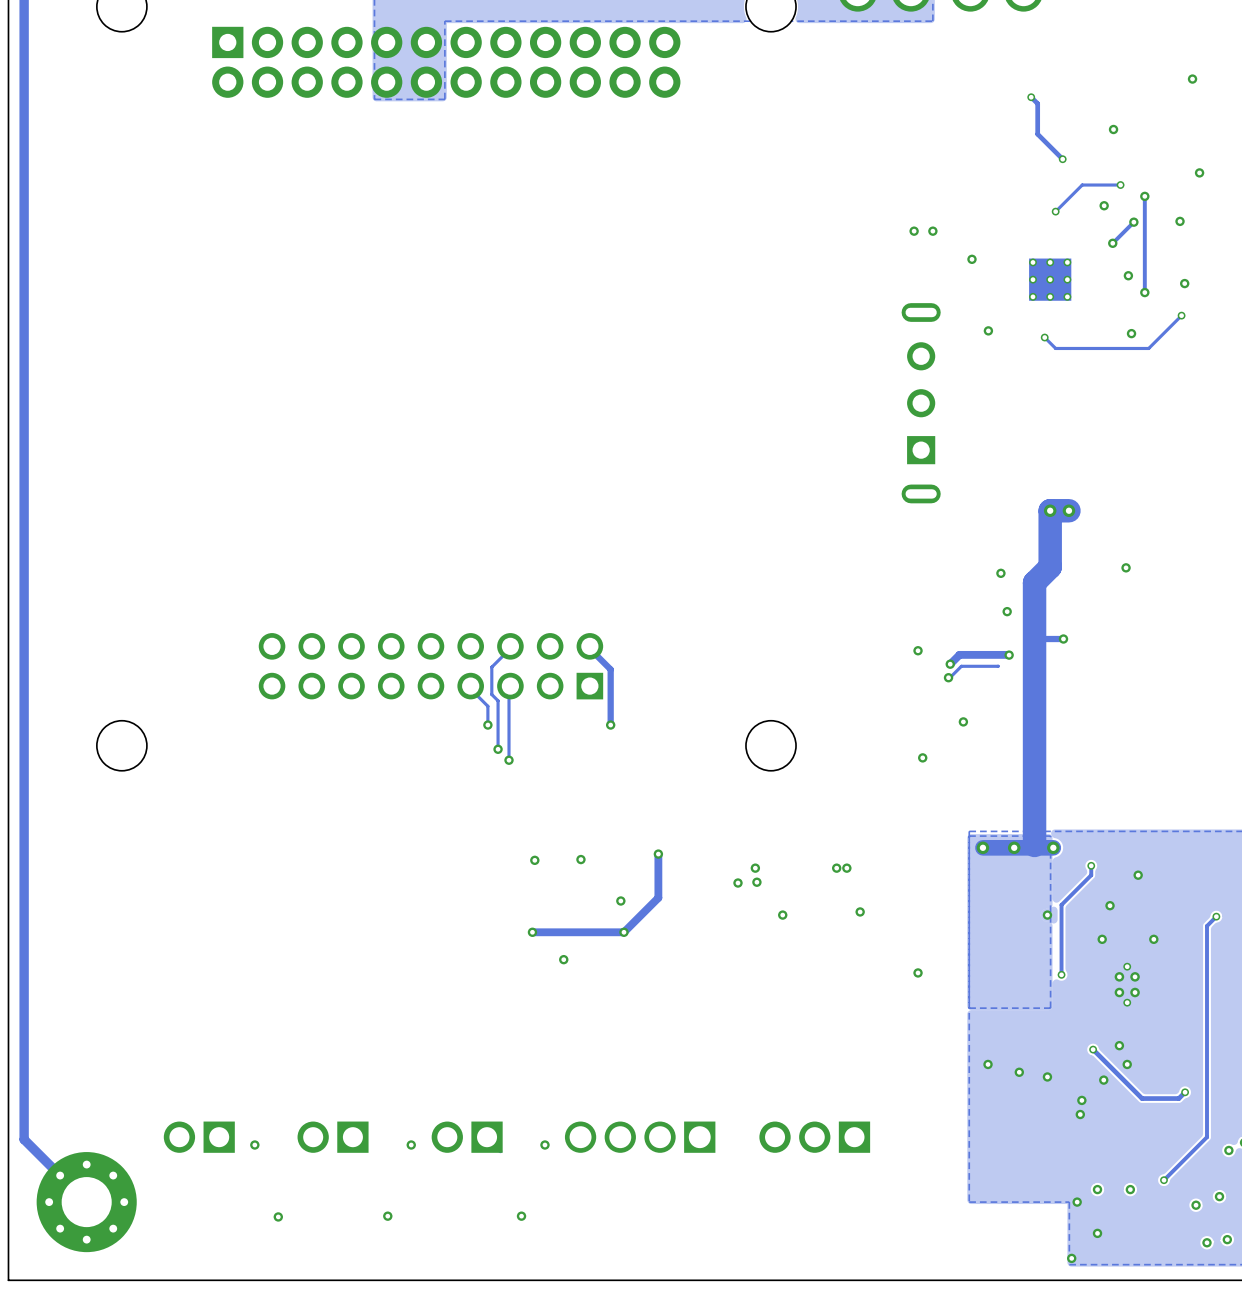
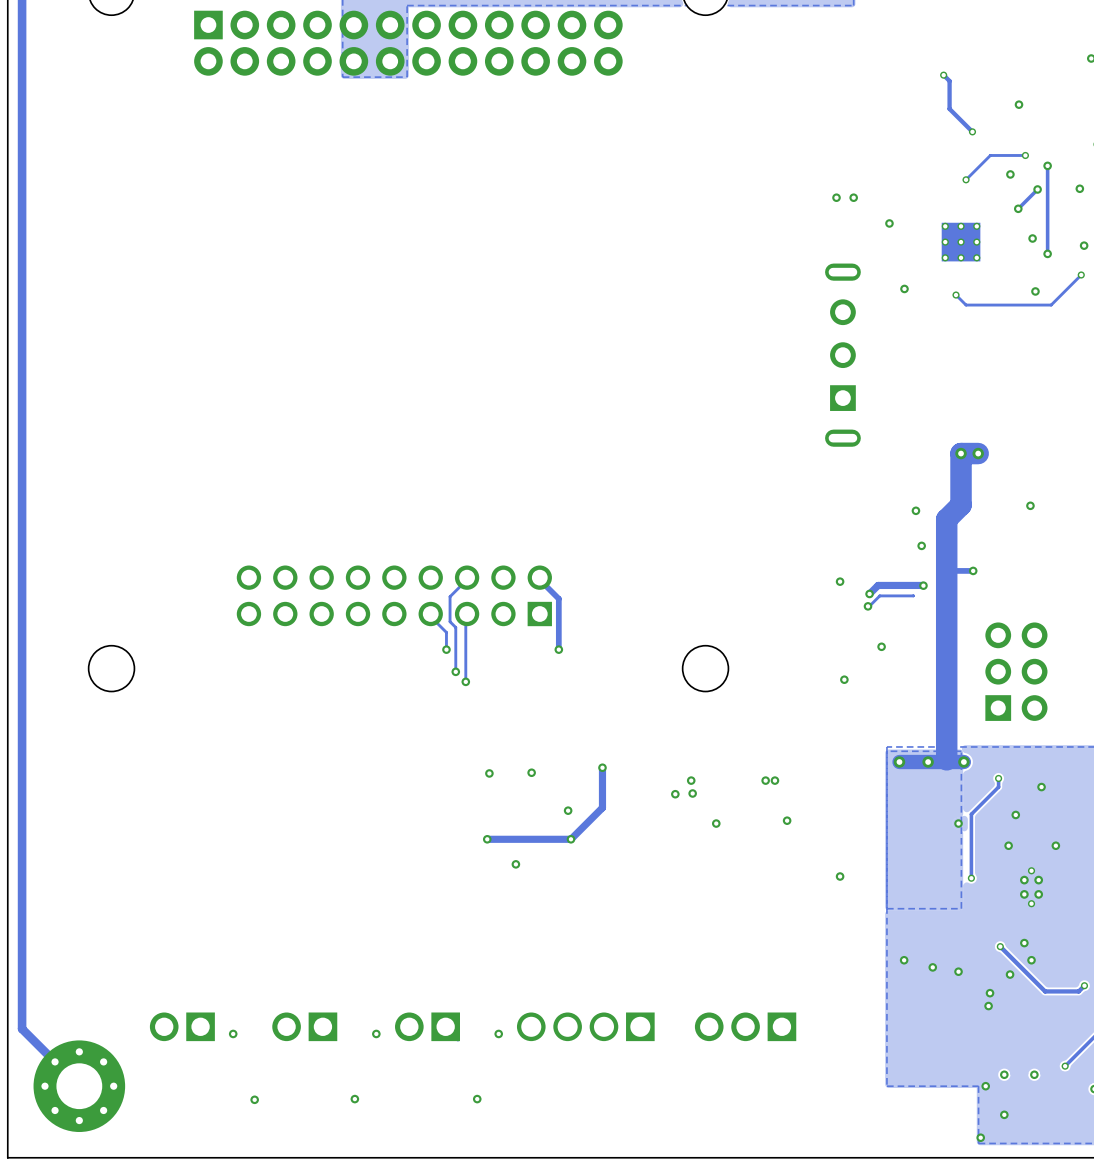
part: none -> (1016, 671)

